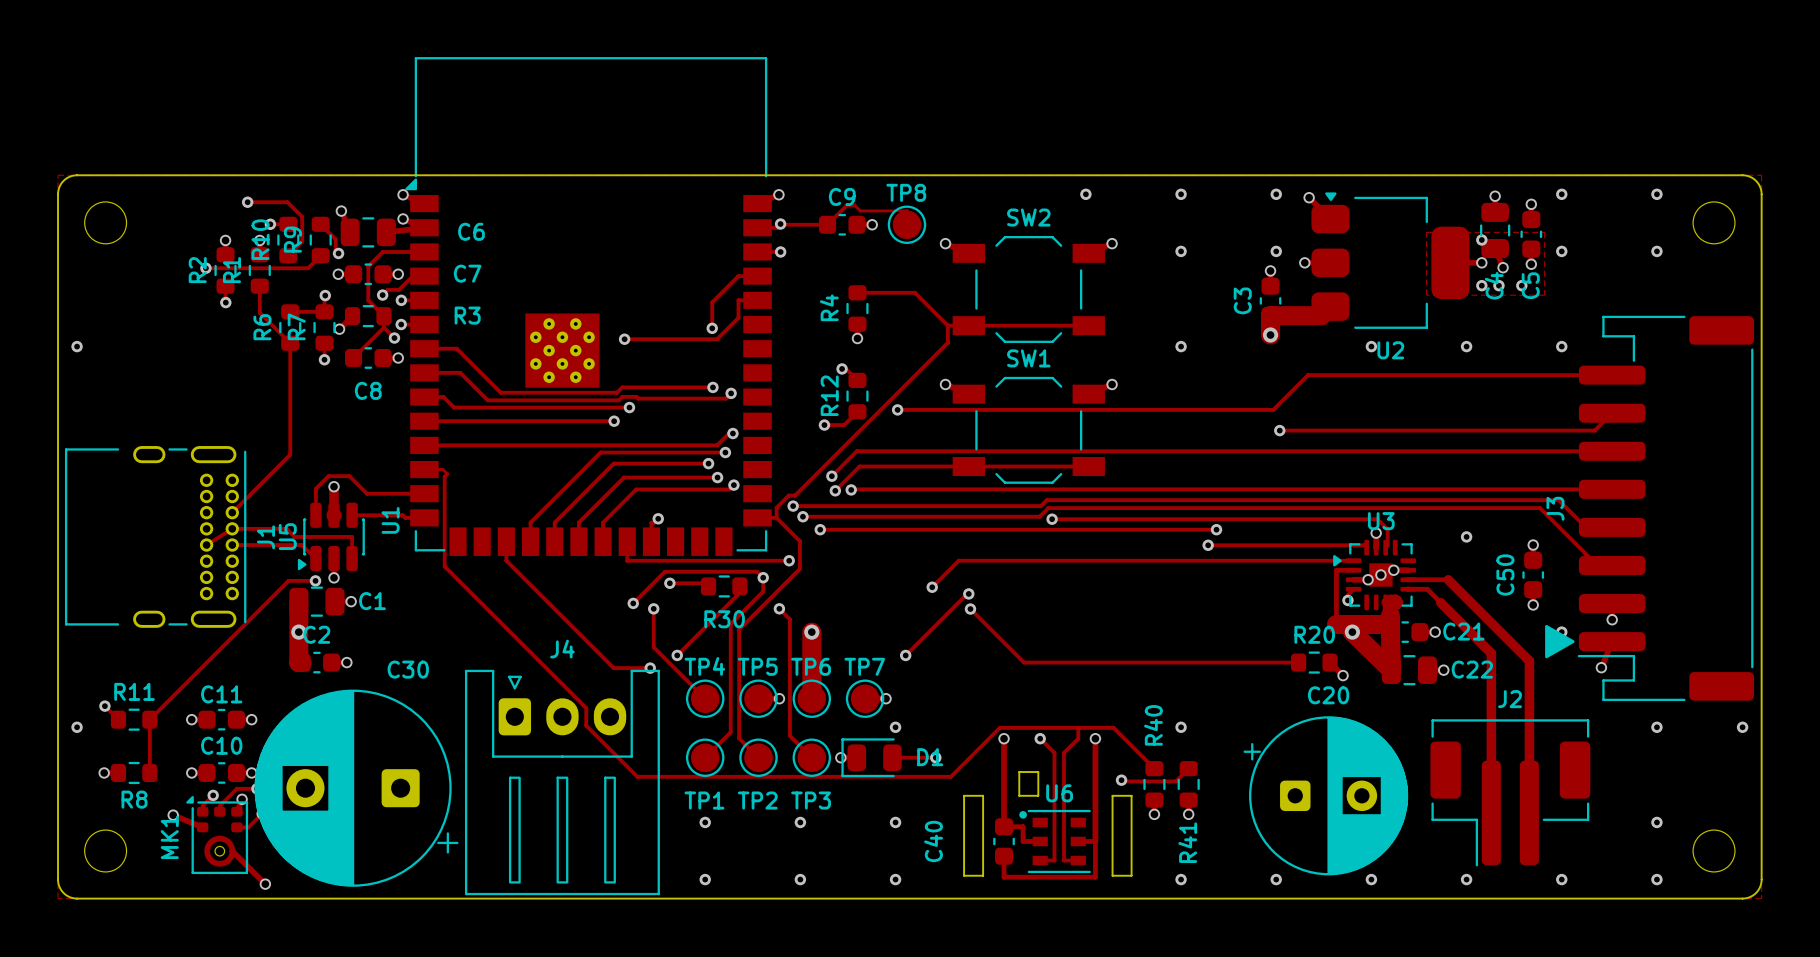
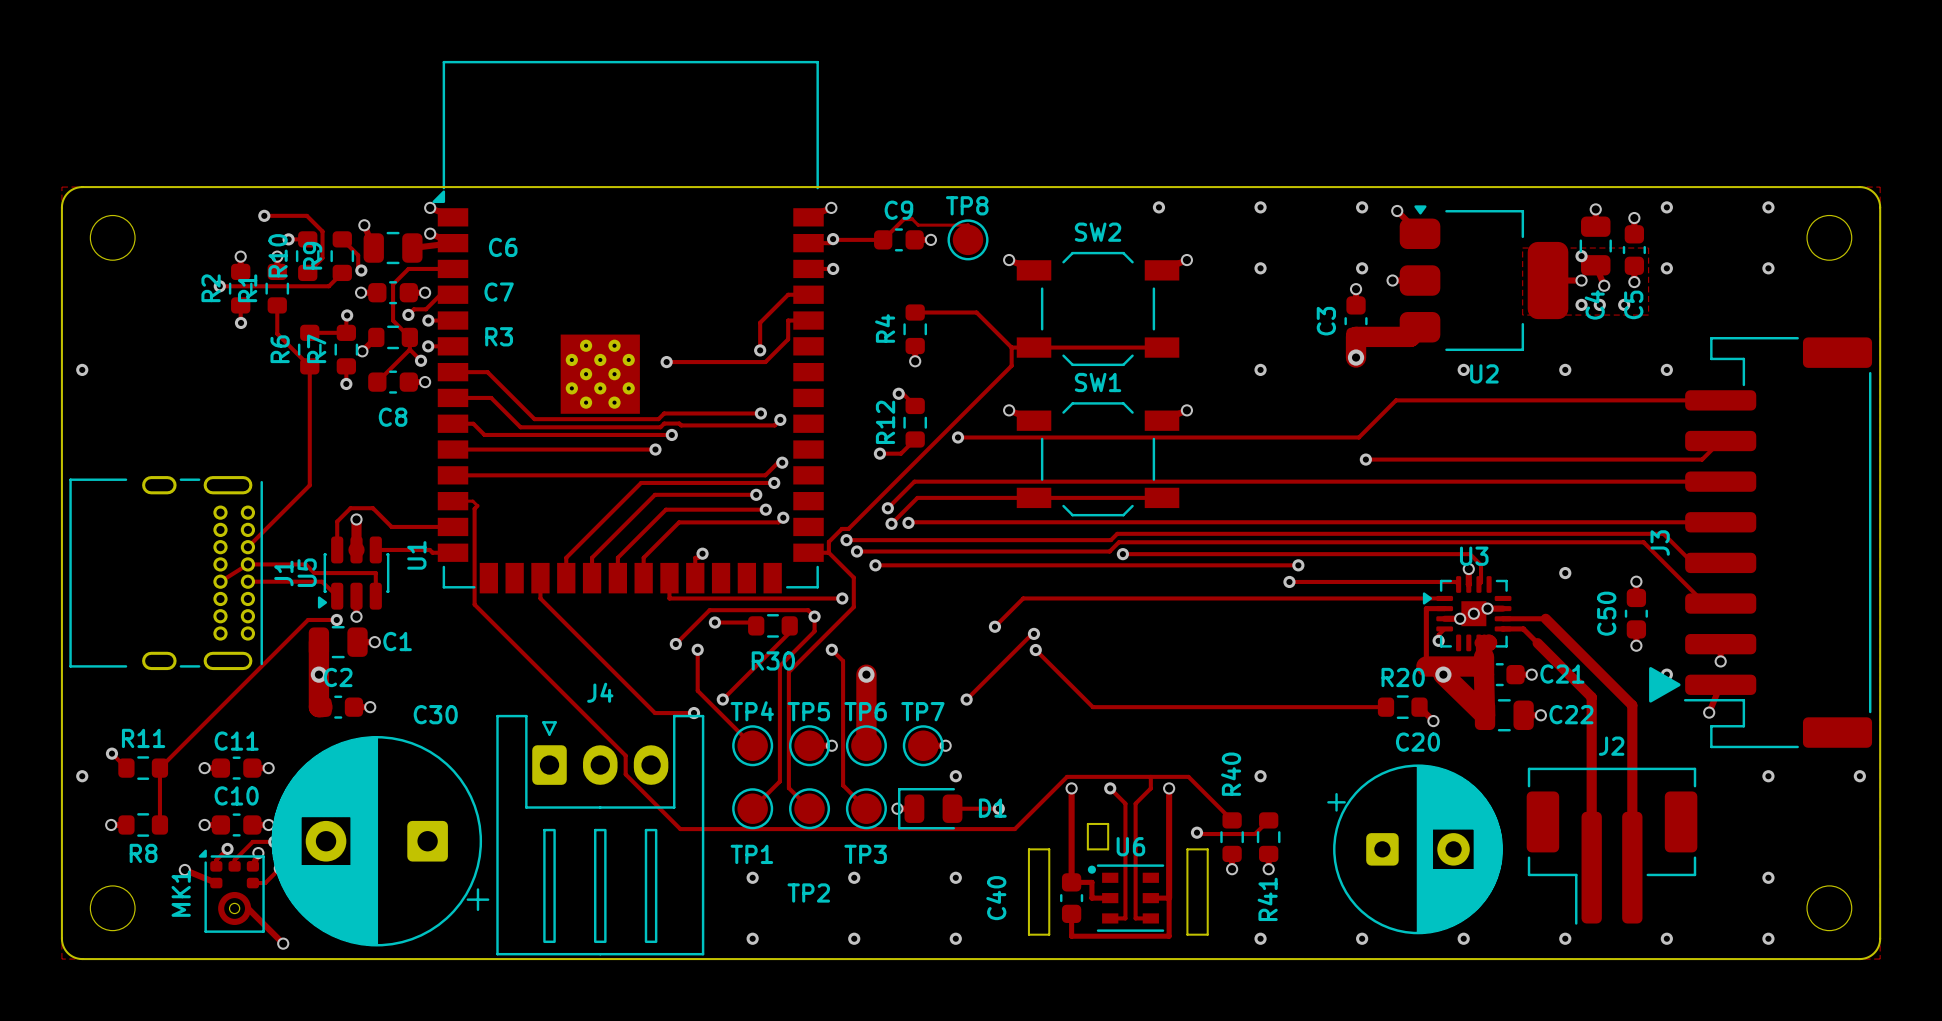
TP2 name position: TP2 (757, 800) -> TP2 (808, 892)

